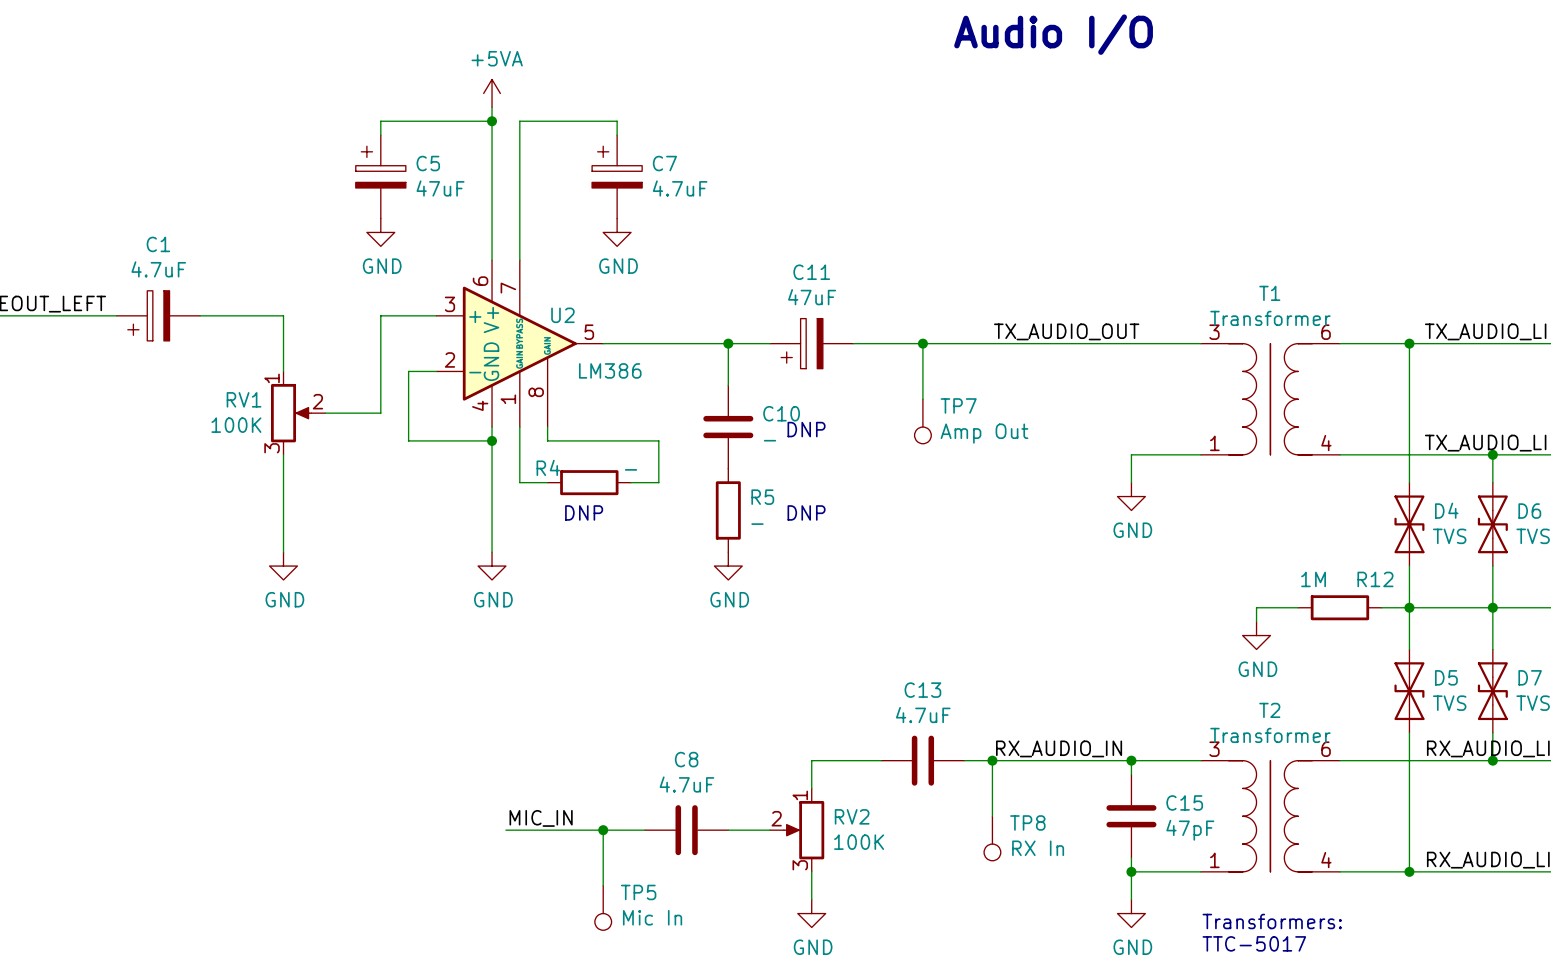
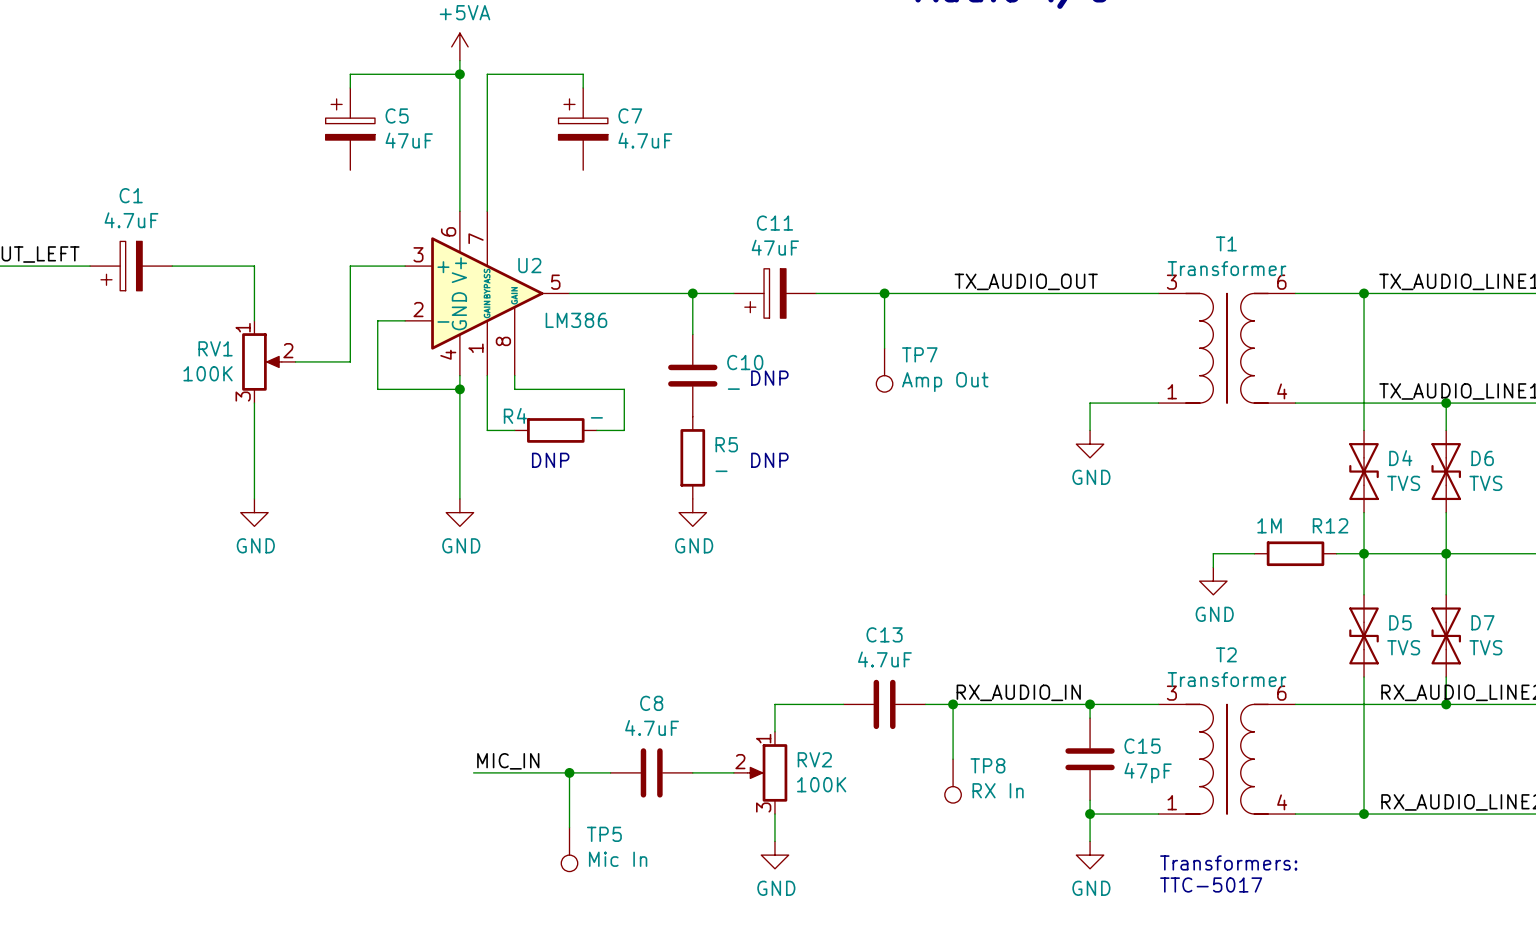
power symbol: GND (380, 232) -> none
power symbol: GND (617, 232) -> none

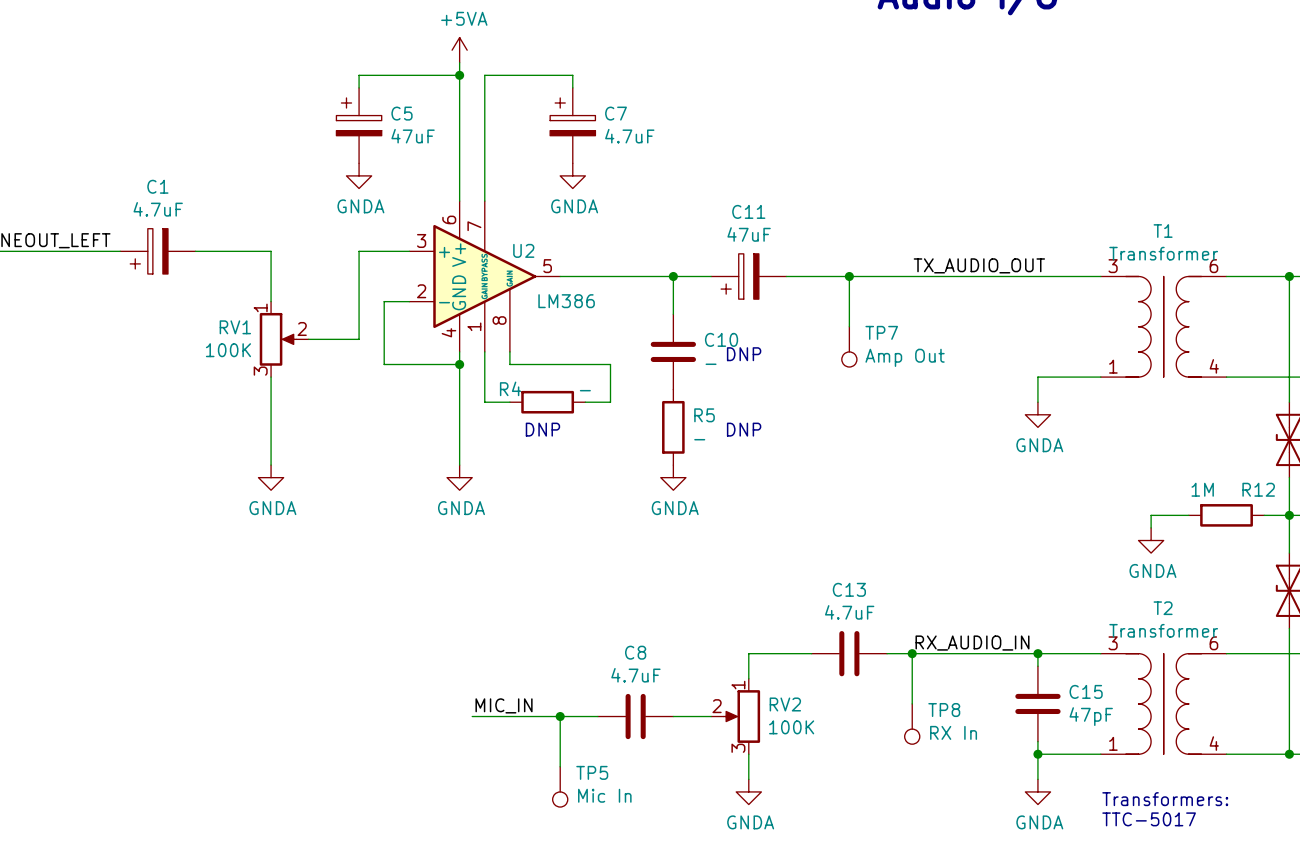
power symbol: none -> GNDA (359, 175)
power symbol: none -> GNDA (572, 175)
power symbol: GND (1090, 444) -> GNDA (1037, 414)
power symbol: GND (254, 512) -> GNDA (271, 477)
power symbol: GND (459, 512) -> GNDA (459, 477)
power symbol: GND (692, 512) -> GNDA (673, 477)
power symbol: GND (1213, 581) -> GNDA (1151, 540)
power symbol: GND (774, 855) -> GNDA (748, 791)
power symbol: GND (1090, 855) -> GNDA (1037, 791)

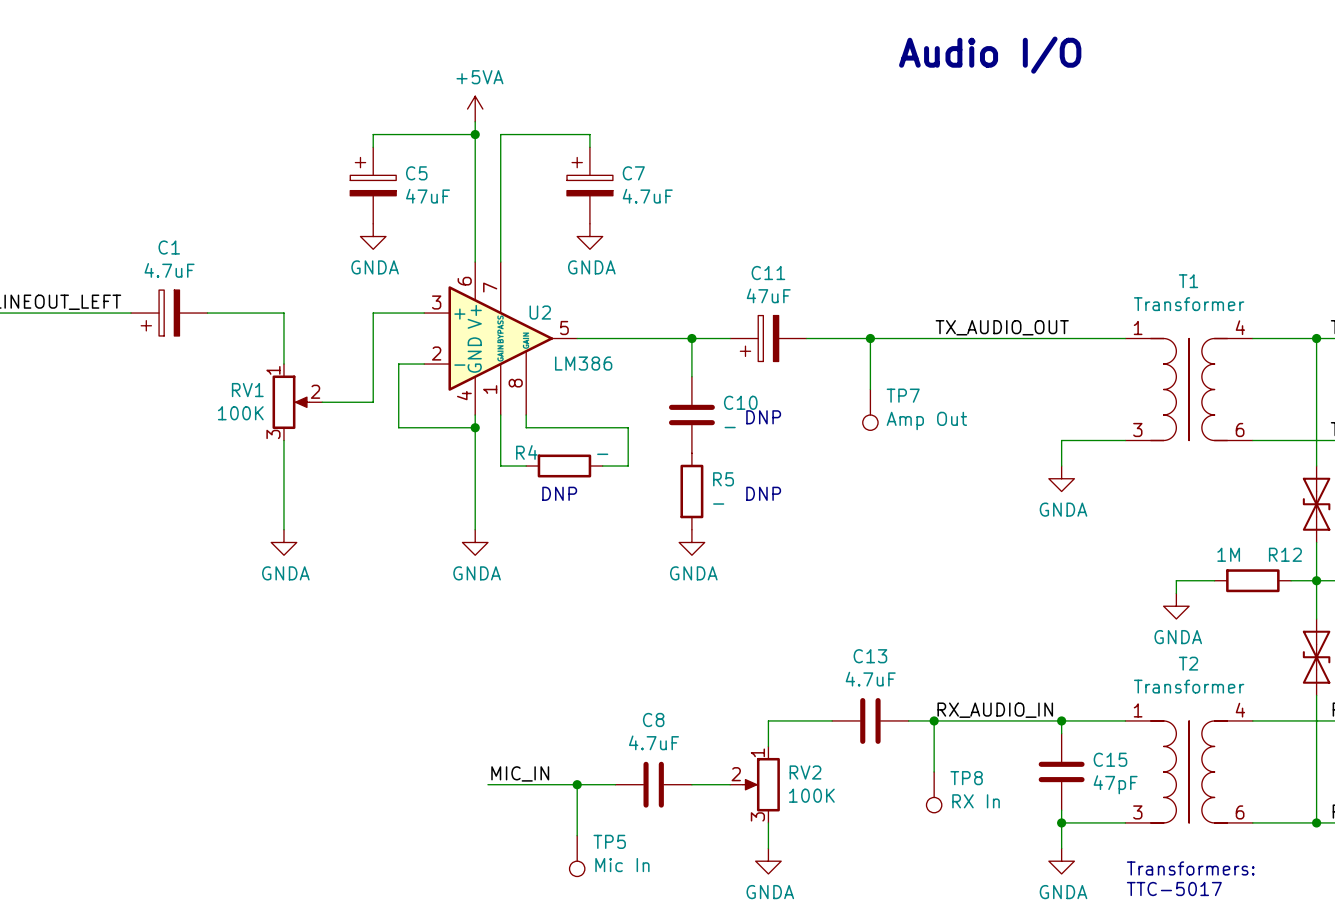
T1 flip: as is (1163, 326) -> up-down (1189, 389)
T2 flip: as is (1163, 703) -> up-down (1189, 771)

